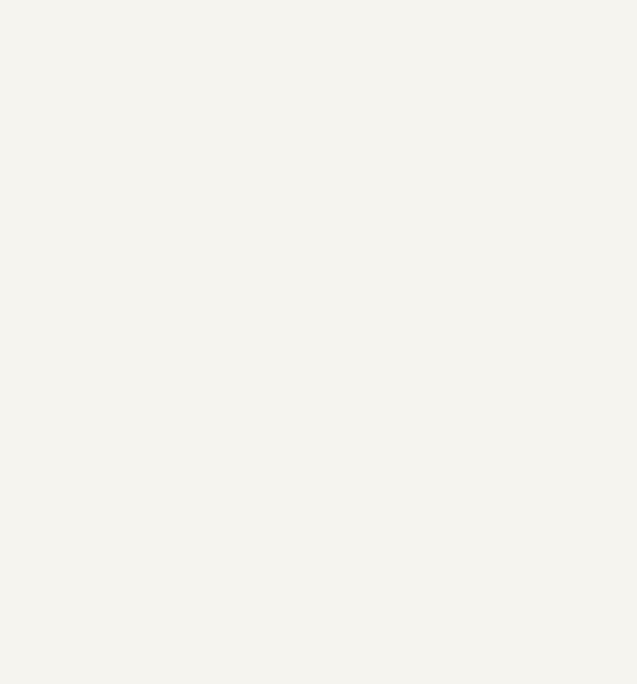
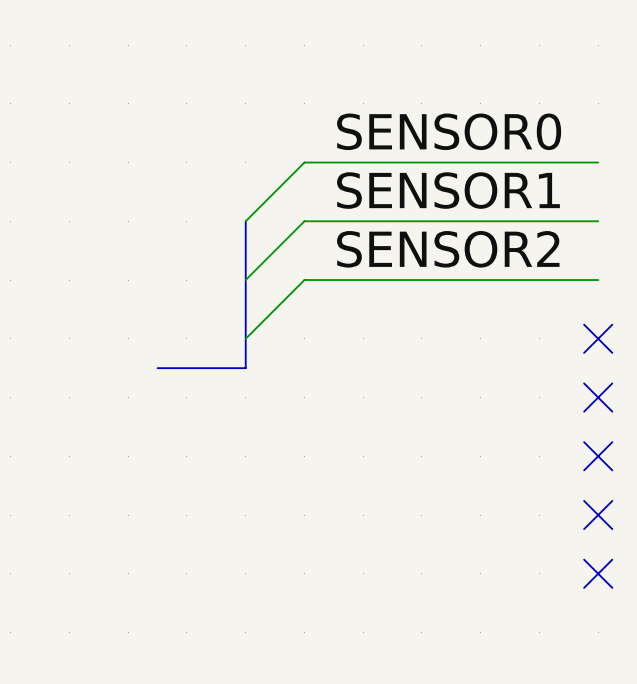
label: none -> SENSOR0 (449, 131)
wire: none -> (598, 162) (304, 162) (245, 221)
label: none -> SENSOR1 (448, 190)
bus: none -> (245, 221) (245, 368) (157, 368)
wire: none -> (598, 221) (304, 221) (245, 280)
label: none -> SENSOR2 (448, 249)
wire: none -> (598, 280) (304, 280) (245, 338)
no-connect mark: none -> (598, 338)
no-connect mark: none -> (598, 397)
no-connect mark: none -> (598, 456)
no-connect mark: none -> (598, 515)
no-connect mark: none -> (598, 573)

